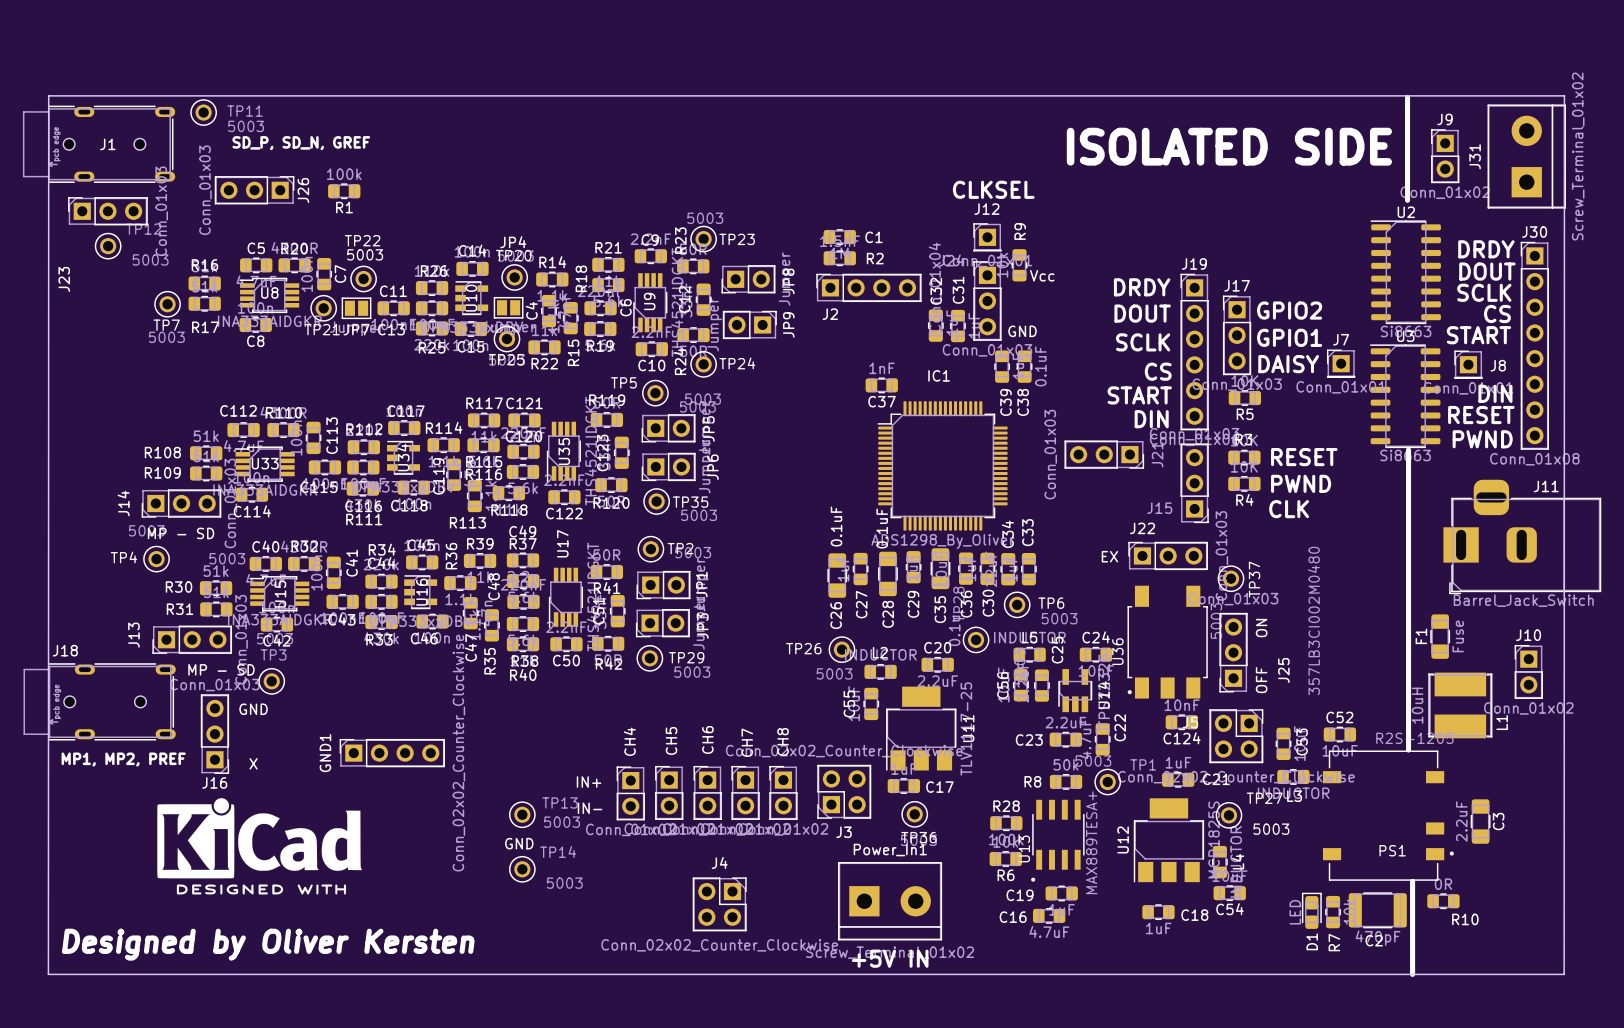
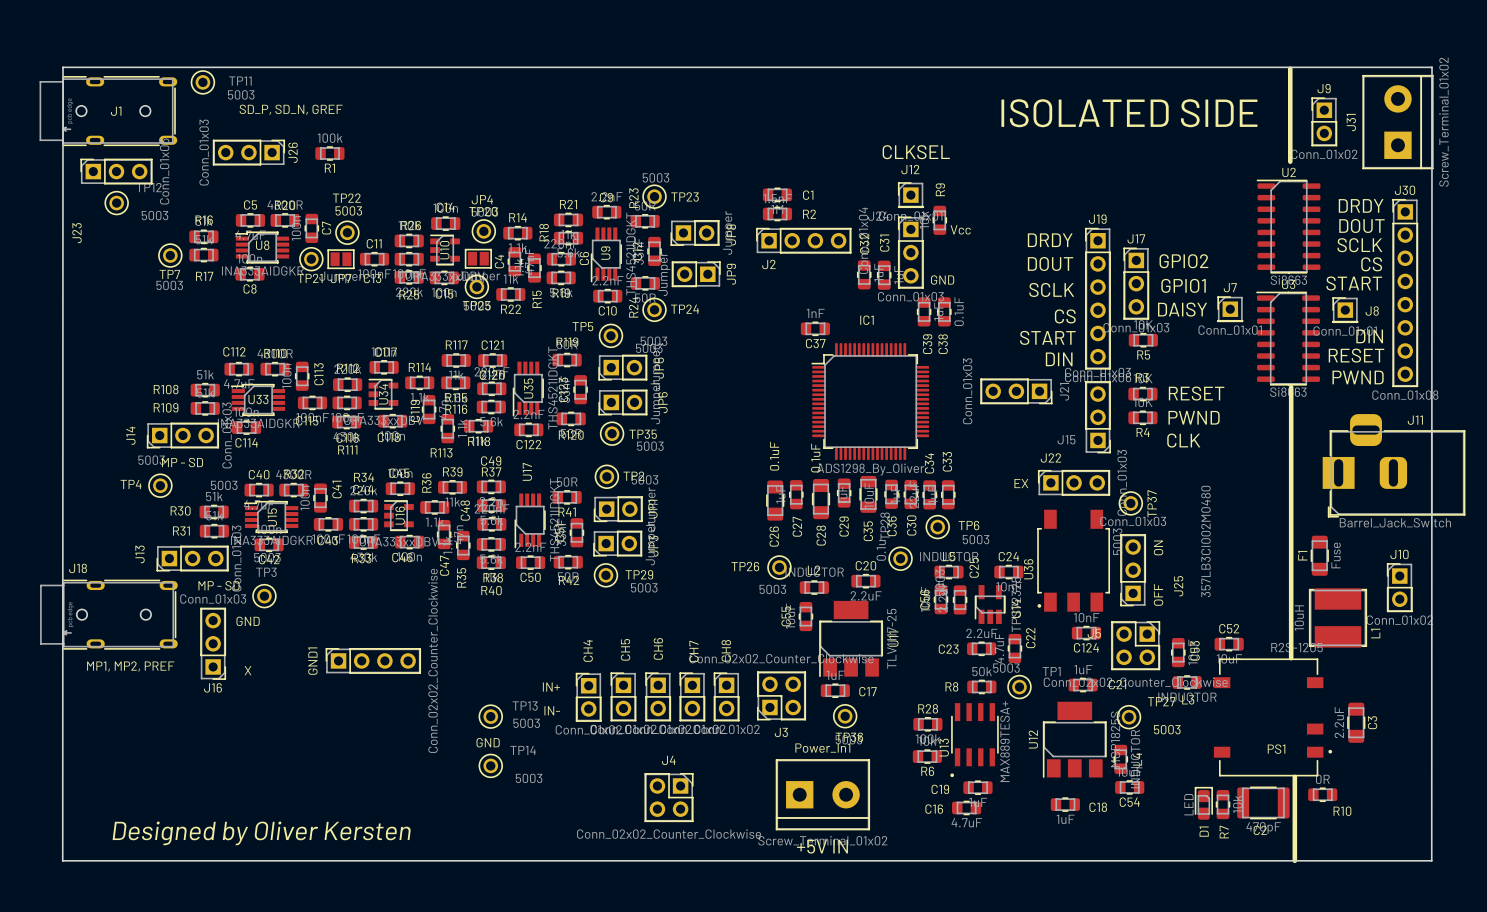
drawing: [157, 798, 363, 895] -> none

